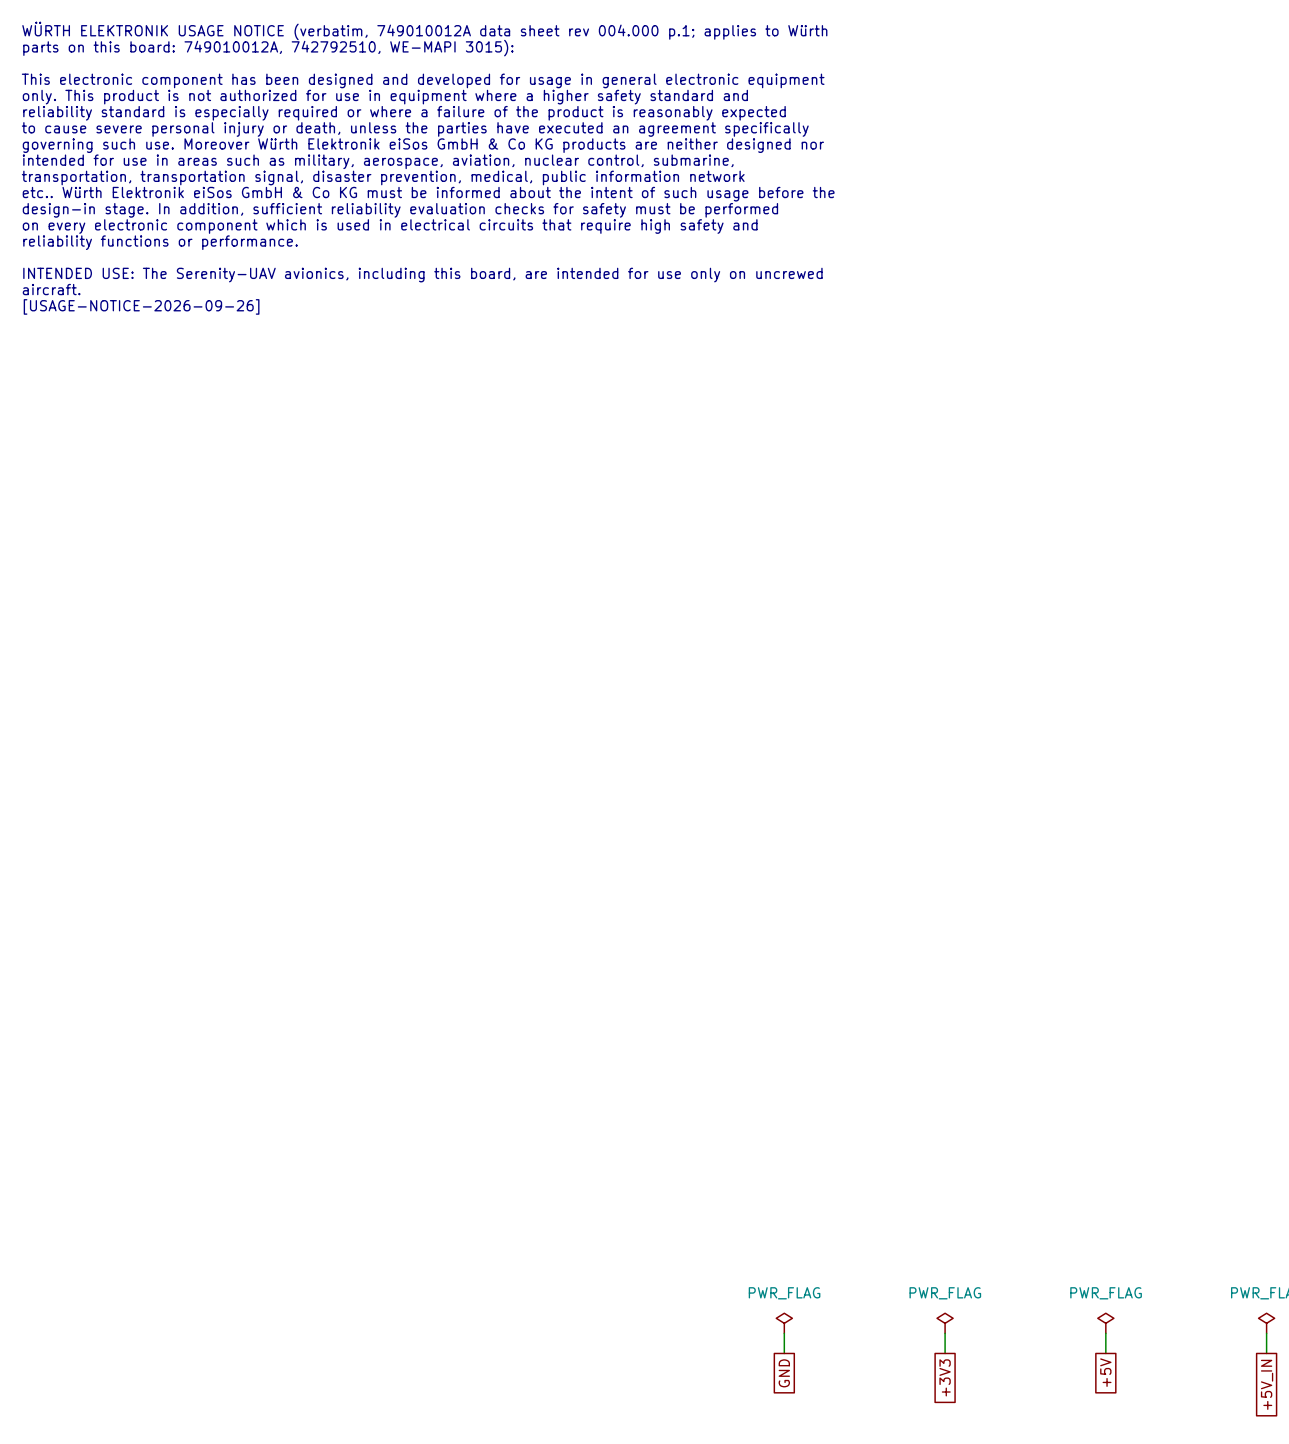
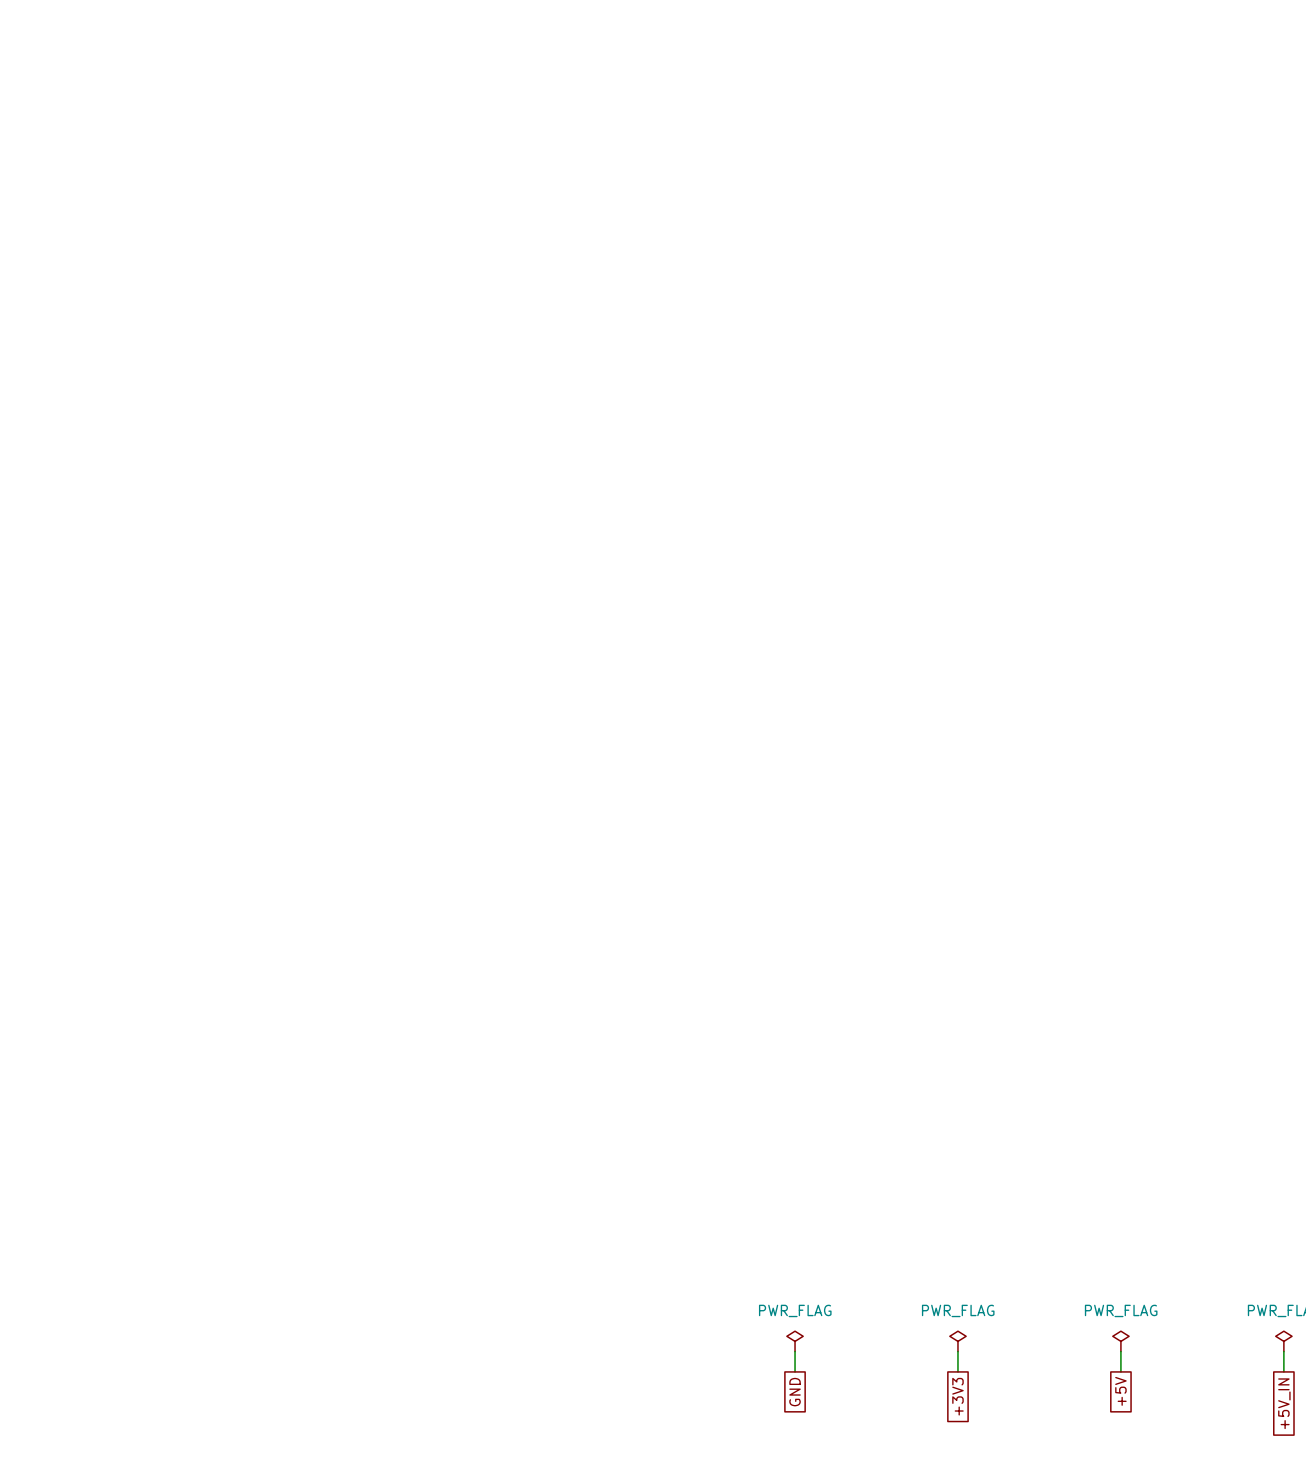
text: WÜRTH ELEKTRONIK USAGE NOTICE (verbatim, 749010012A data sheet rev 004.000 p.1; applies to Würth (424, 30) -> none
text: parts on this board: 749010012A, 742792510, WE-MAPI 3015): (268, 48) -> none
text: This electronic component has been designed and developed for usage in general electronic equipment (423, 80) -> none
text: only. This product is not authorized for use in equipment where a higher safety standard and (385, 97) -> none
text: reliability standard is especially required or where a failure of the product is reasonably expected (404, 113) -> none
text: to cause severe personal injury or death, unless the parties have executed an agreement specifically (415, 129) -> none
text: governing such use. Moreover Würth Elektronik eiSos GmbH & Co KG products are neither designed nor (423, 145) -> none
text: intended for use in areas such as military, aerospace, aviation, nuclear control, submarine, (378, 161) -> none
text: transportation, transportation signal, disaster prevention, medical, public information network (383, 177) -> none
text: etc.. Würth Elektronik eiSos GmbH & Co KG must be informed about the intent of such usage before the (428, 194) -> none
text: design-in stage. In addition, sufficient reliability evaluation checks for safety must be performed (400, 210) -> none
text: on every electronic component which is used in electrical circuits that require high safety and (390, 226) -> none
text: reliability functions or performance. (160, 242) -> none
text: INTENDED USE: The Serenity-UAV avionics, including this board, are intended for use only on uncrewed (422, 275) -> none
text: aircraft. (51, 289) -> none
text: [USAGE-NOTICE-2026-09-26] (141, 306) -> none

